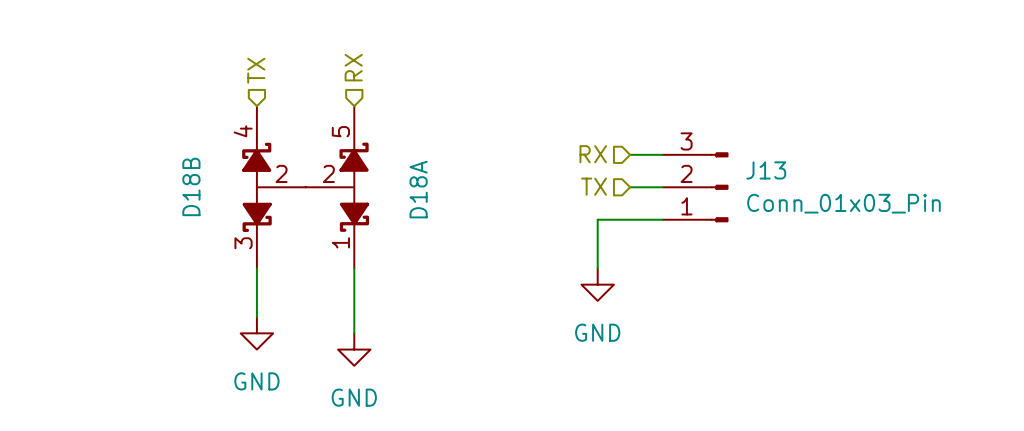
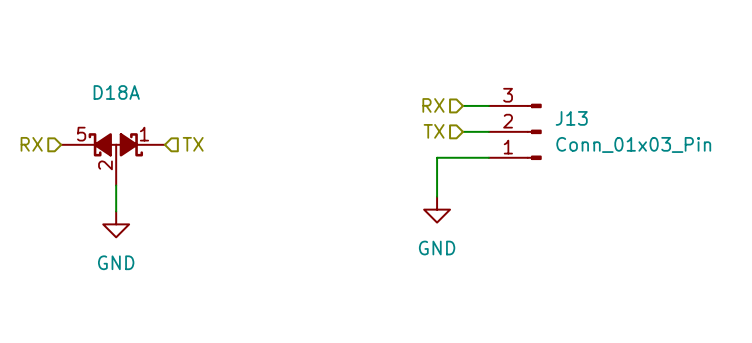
hierarchical label rotation: 0° (353, 67) -> 90° counterclockwise (31, 144)
hierarchical label position: RX (353, 67) -> RX (31, 144)
hierarchical label rotation: 0° (256, 70) -> 90° clockwise (193, 144)
hierarchical label position: TX (256, 70) -> TX (193, 144)
D18A symbol: [305, 106, 370, 269] -> [61, 133, 165, 186]
D18B: (273, 187) -> none
D18A name position: D18A (418, 189) -> D18A (116, 92)
wire: none -> (116, 185) (116, 211)
wire: (256, 268) (256, 317) -> none
wire: (354, 268) (354, 333) -> none
power symbol position: GND (256, 333) -> GND (116, 224)
power symbol: GND (354, 349) -> none

